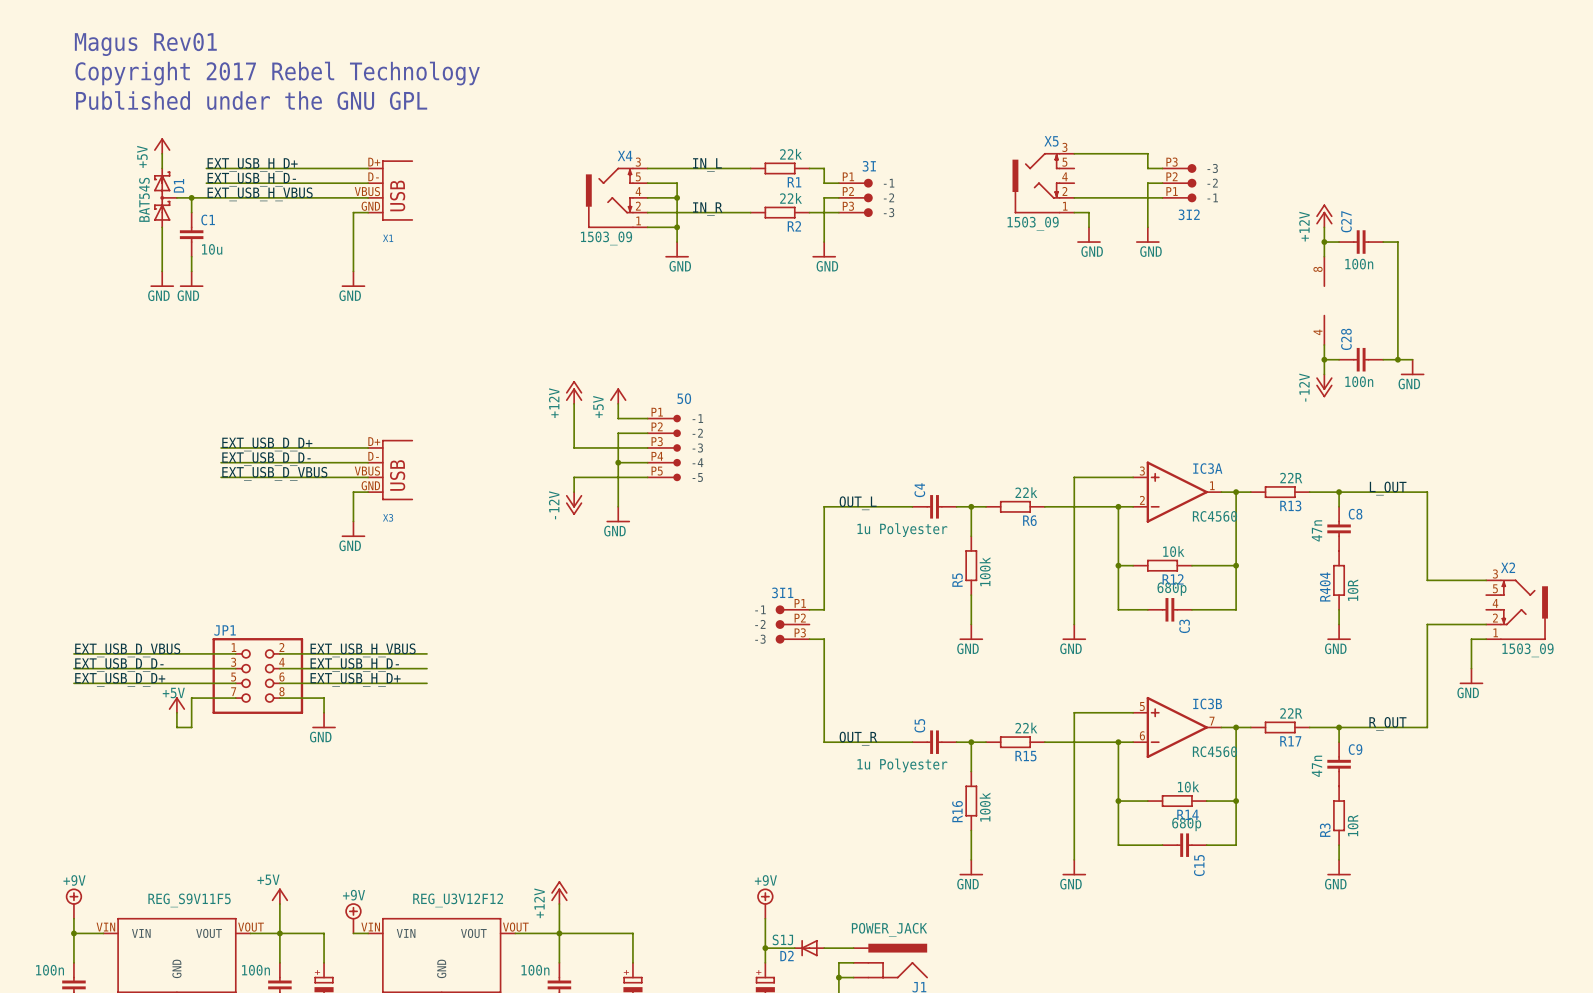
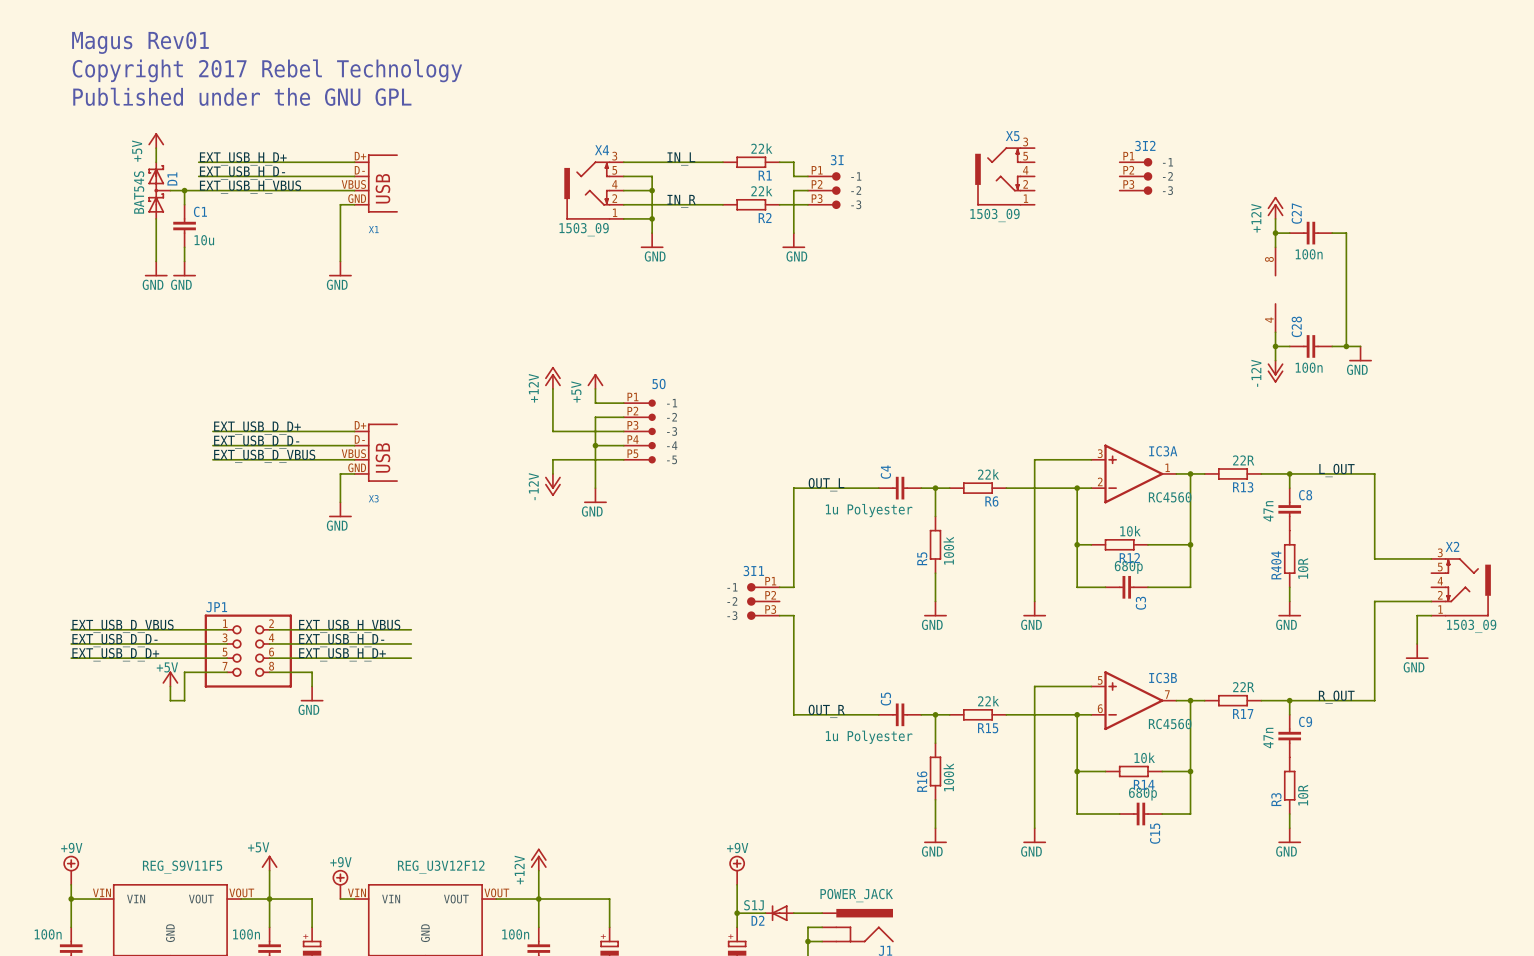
wire: (1074, 153) (1147, 153) (1147, 168) (1162, 168) -> none
wire: (1162, 183) (1147, 183) (1147, 227) -> none
3I2 flip: as is (1191, 183) -> up-down (1148, 176)
wire: (1074, 197) (1162, 197) -> none
wire: (1074, 212) (1088, 212) (1088, 227) -> none
power symbol: GND (1088, 235) -> none
power symbol: GND (1147, 235) -> none

